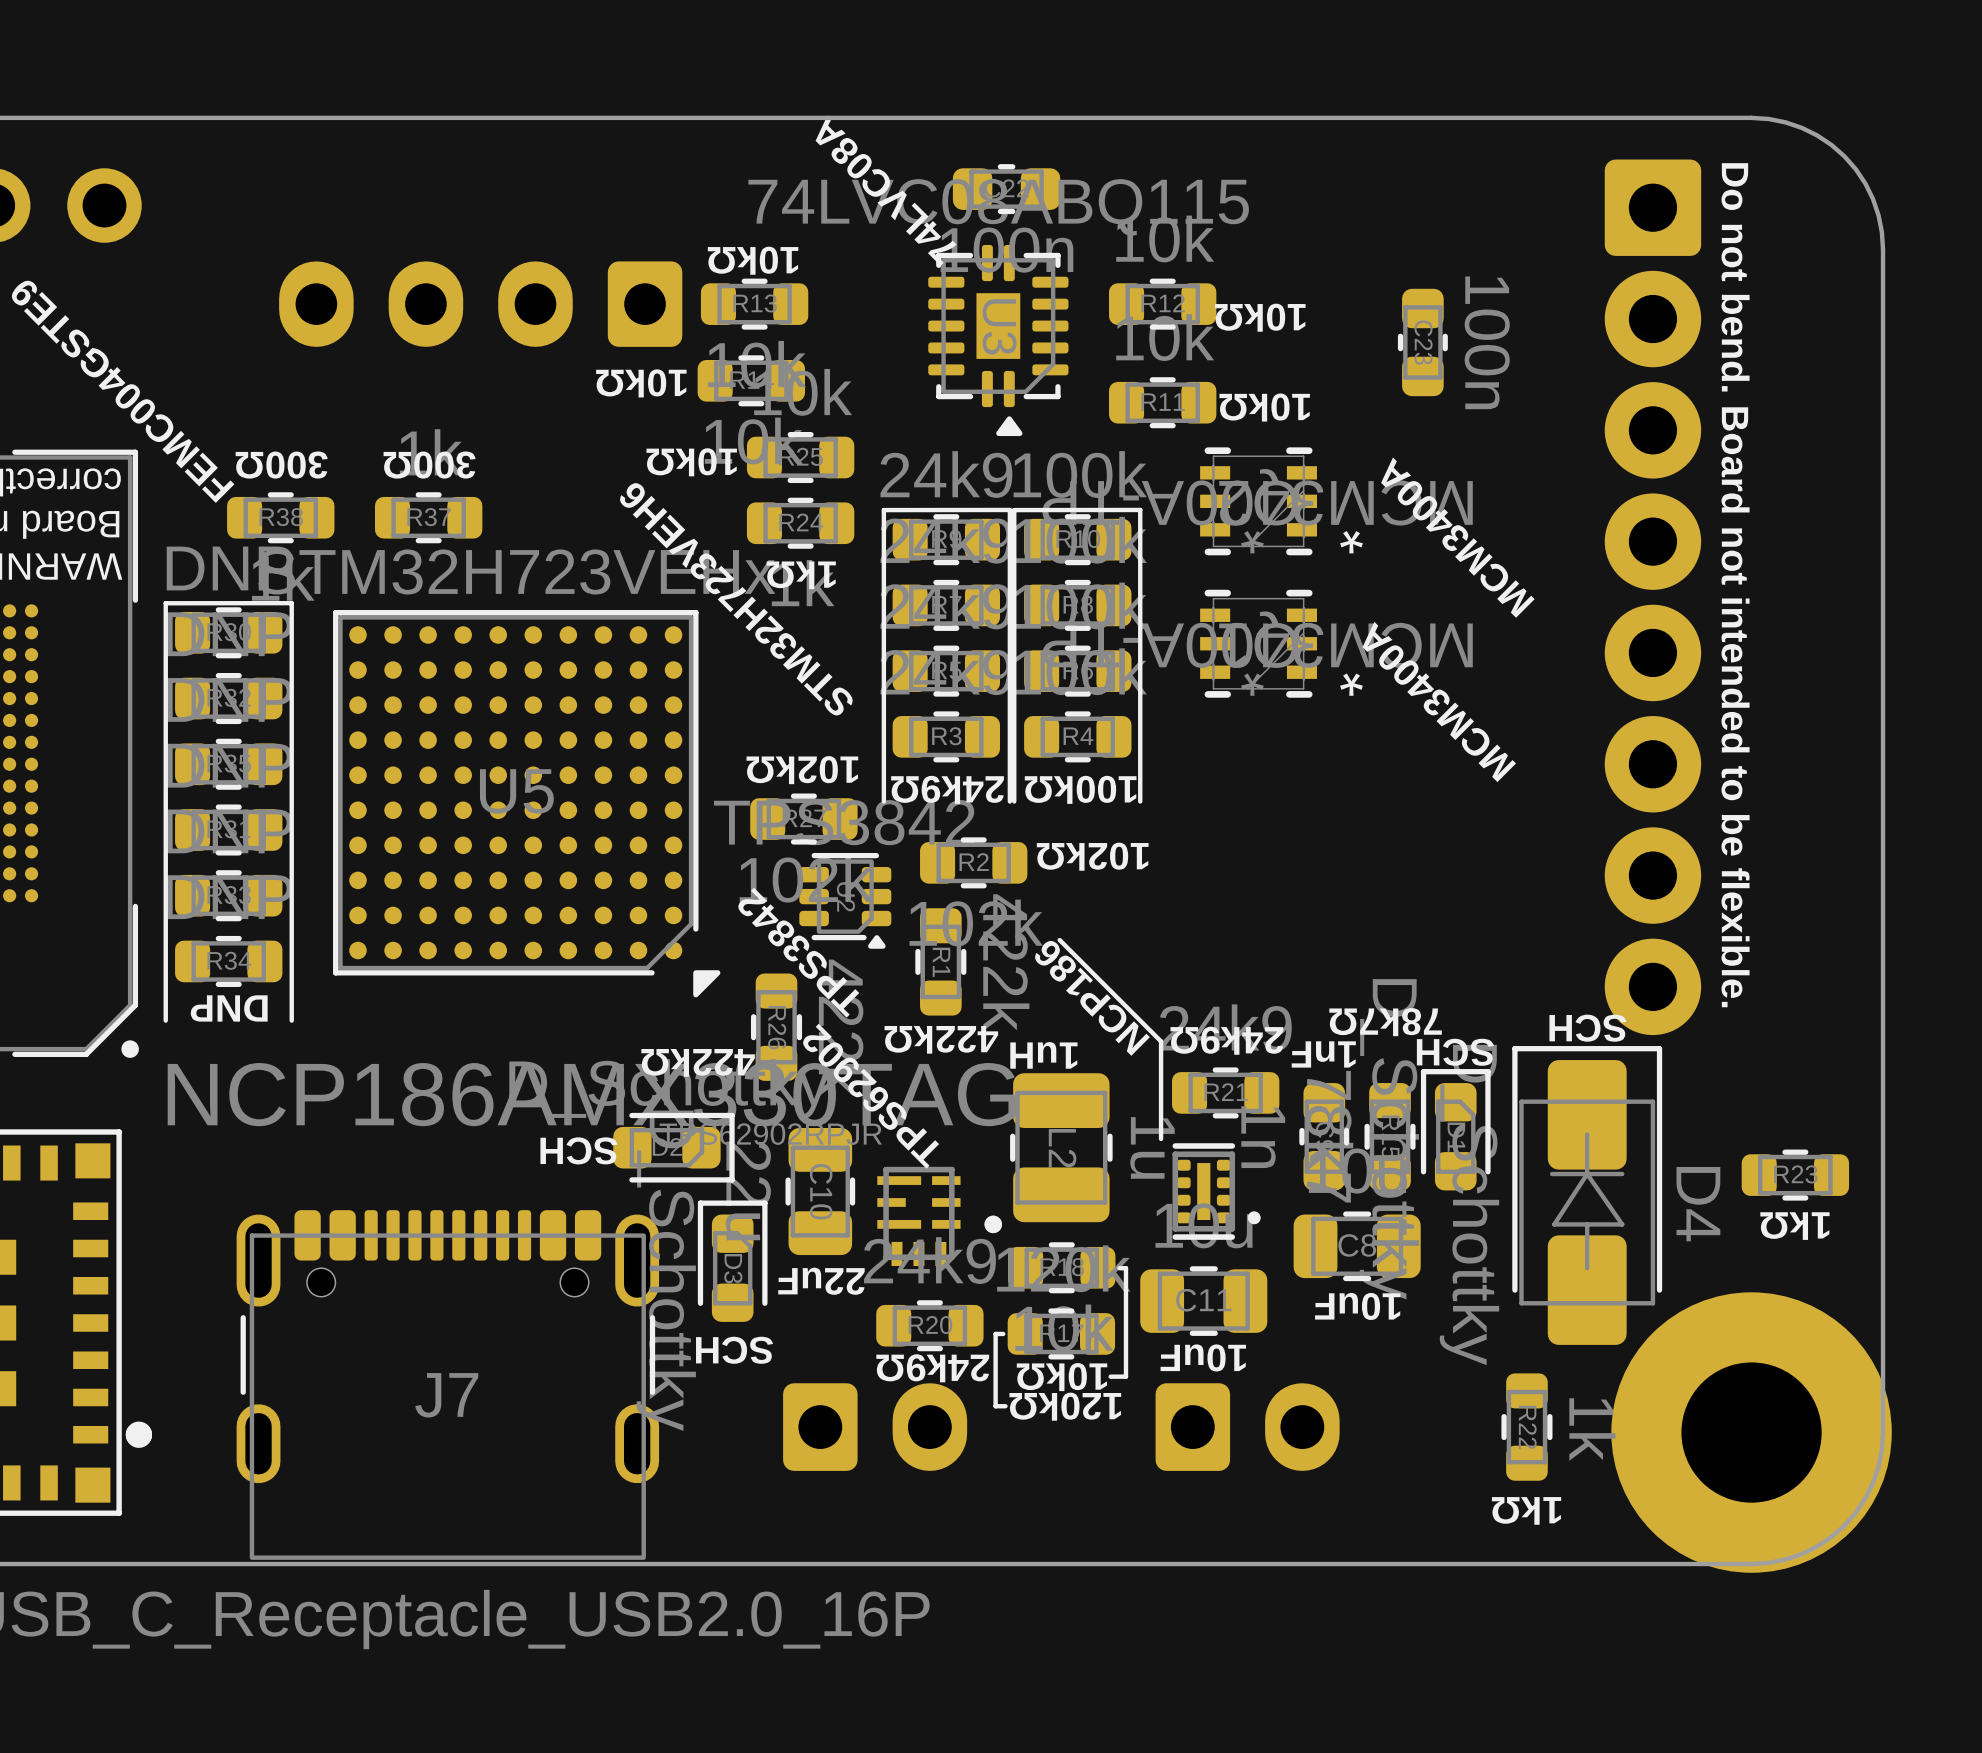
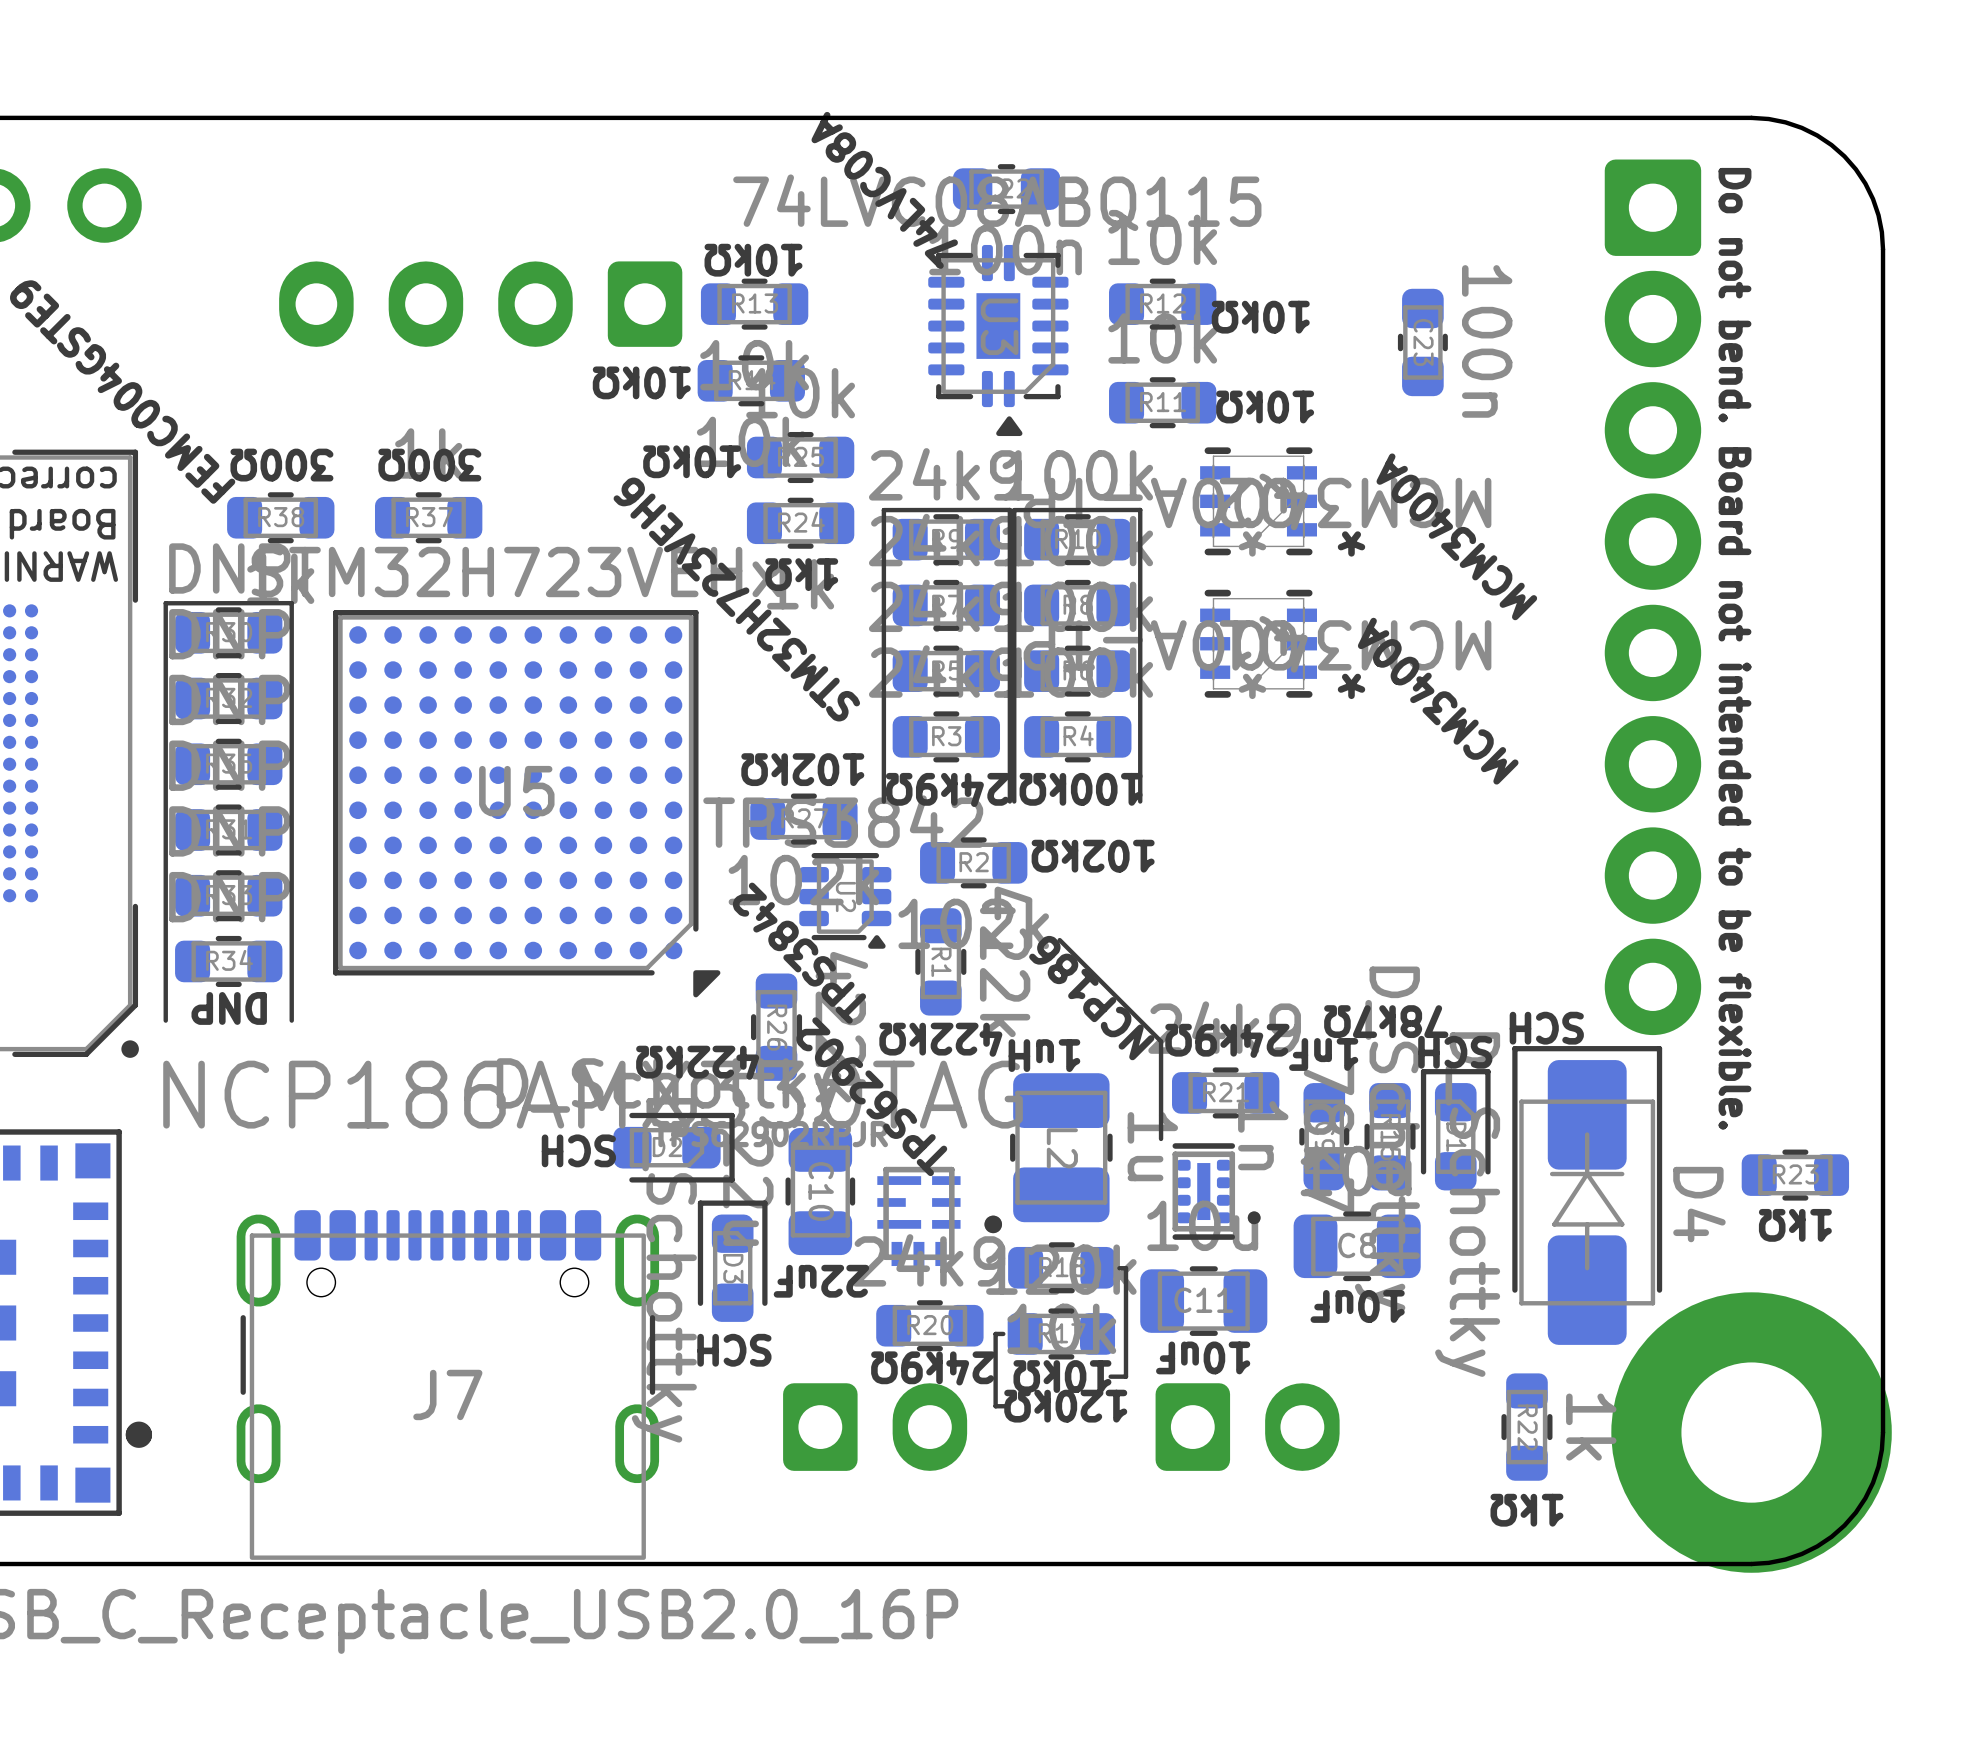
text position: SCH (1587, 1028) -> SCH (1546, 1028)

